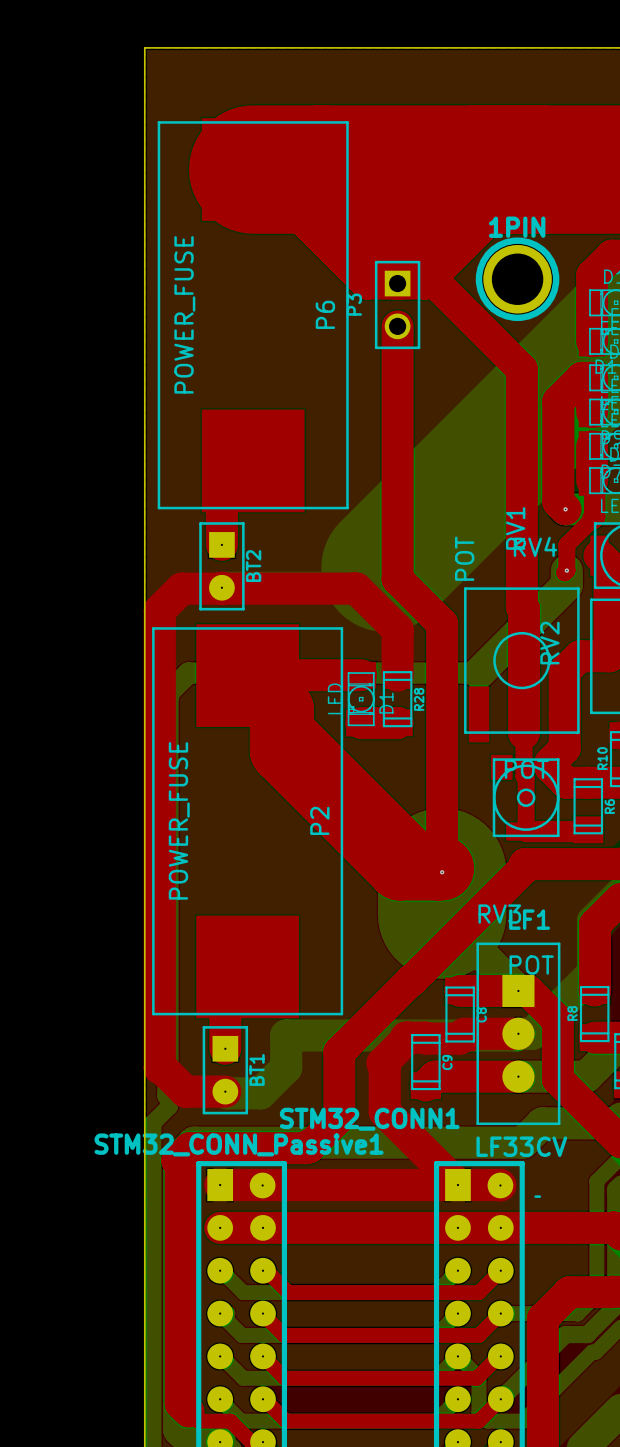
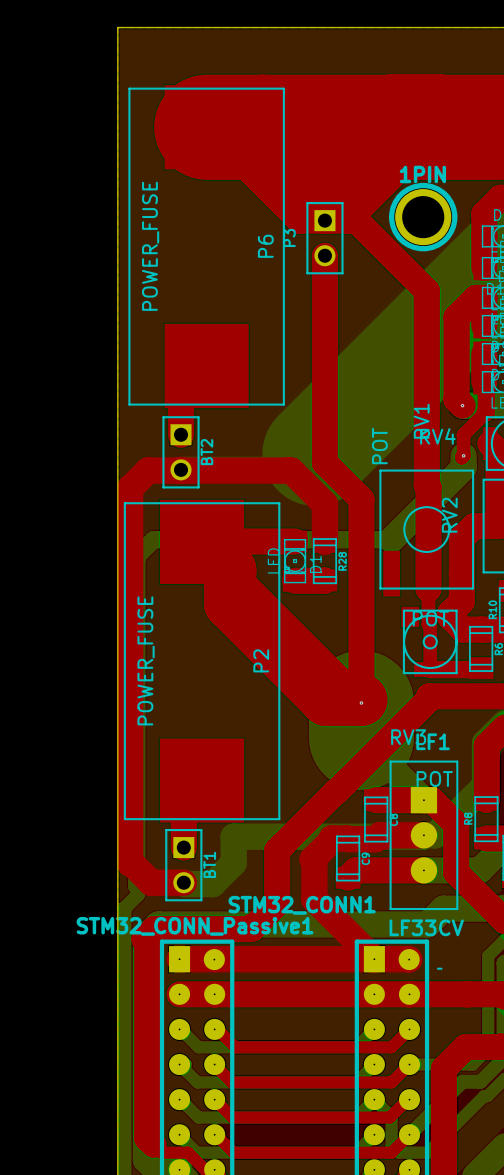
BT2 footprint: [199, 522, 245, 611] -> [162, 416, 200, 489]
BT1 footprint: [202, 1026, 249, 1115] -> [165, 829, 203, 902]

